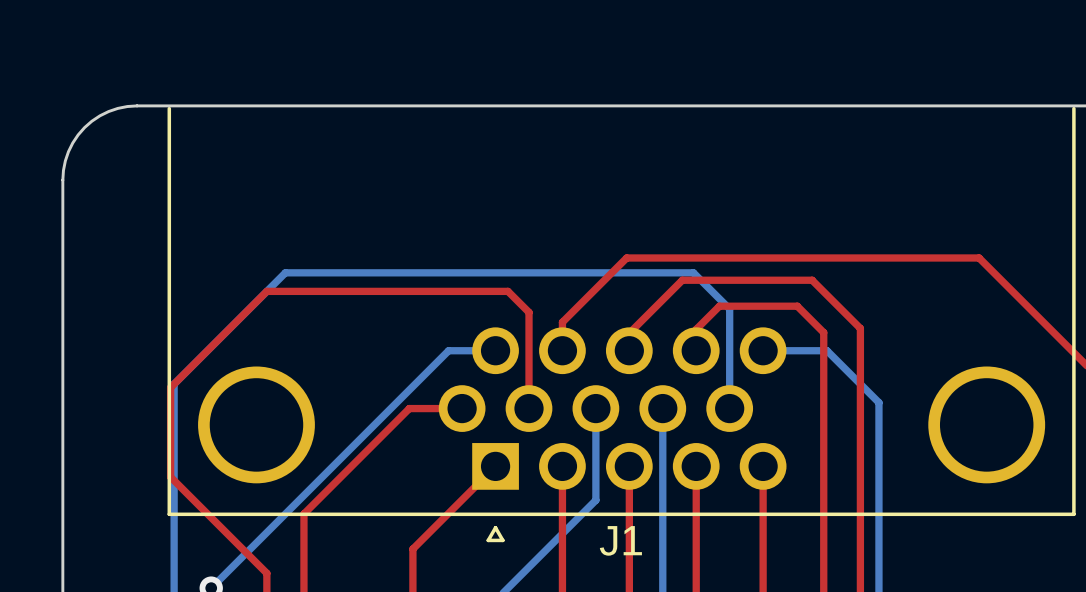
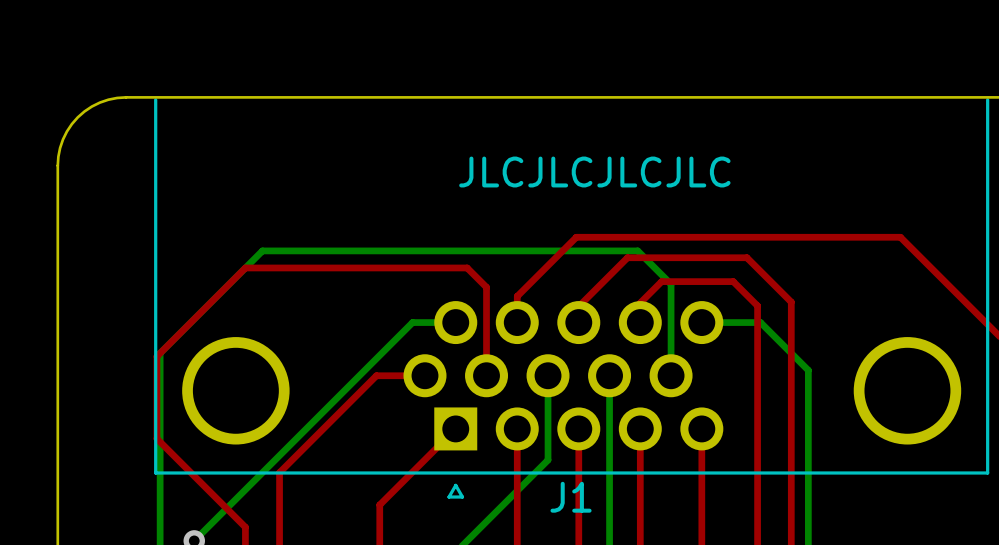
text: none -> JLCJLCJLCJLC (594, 172)

